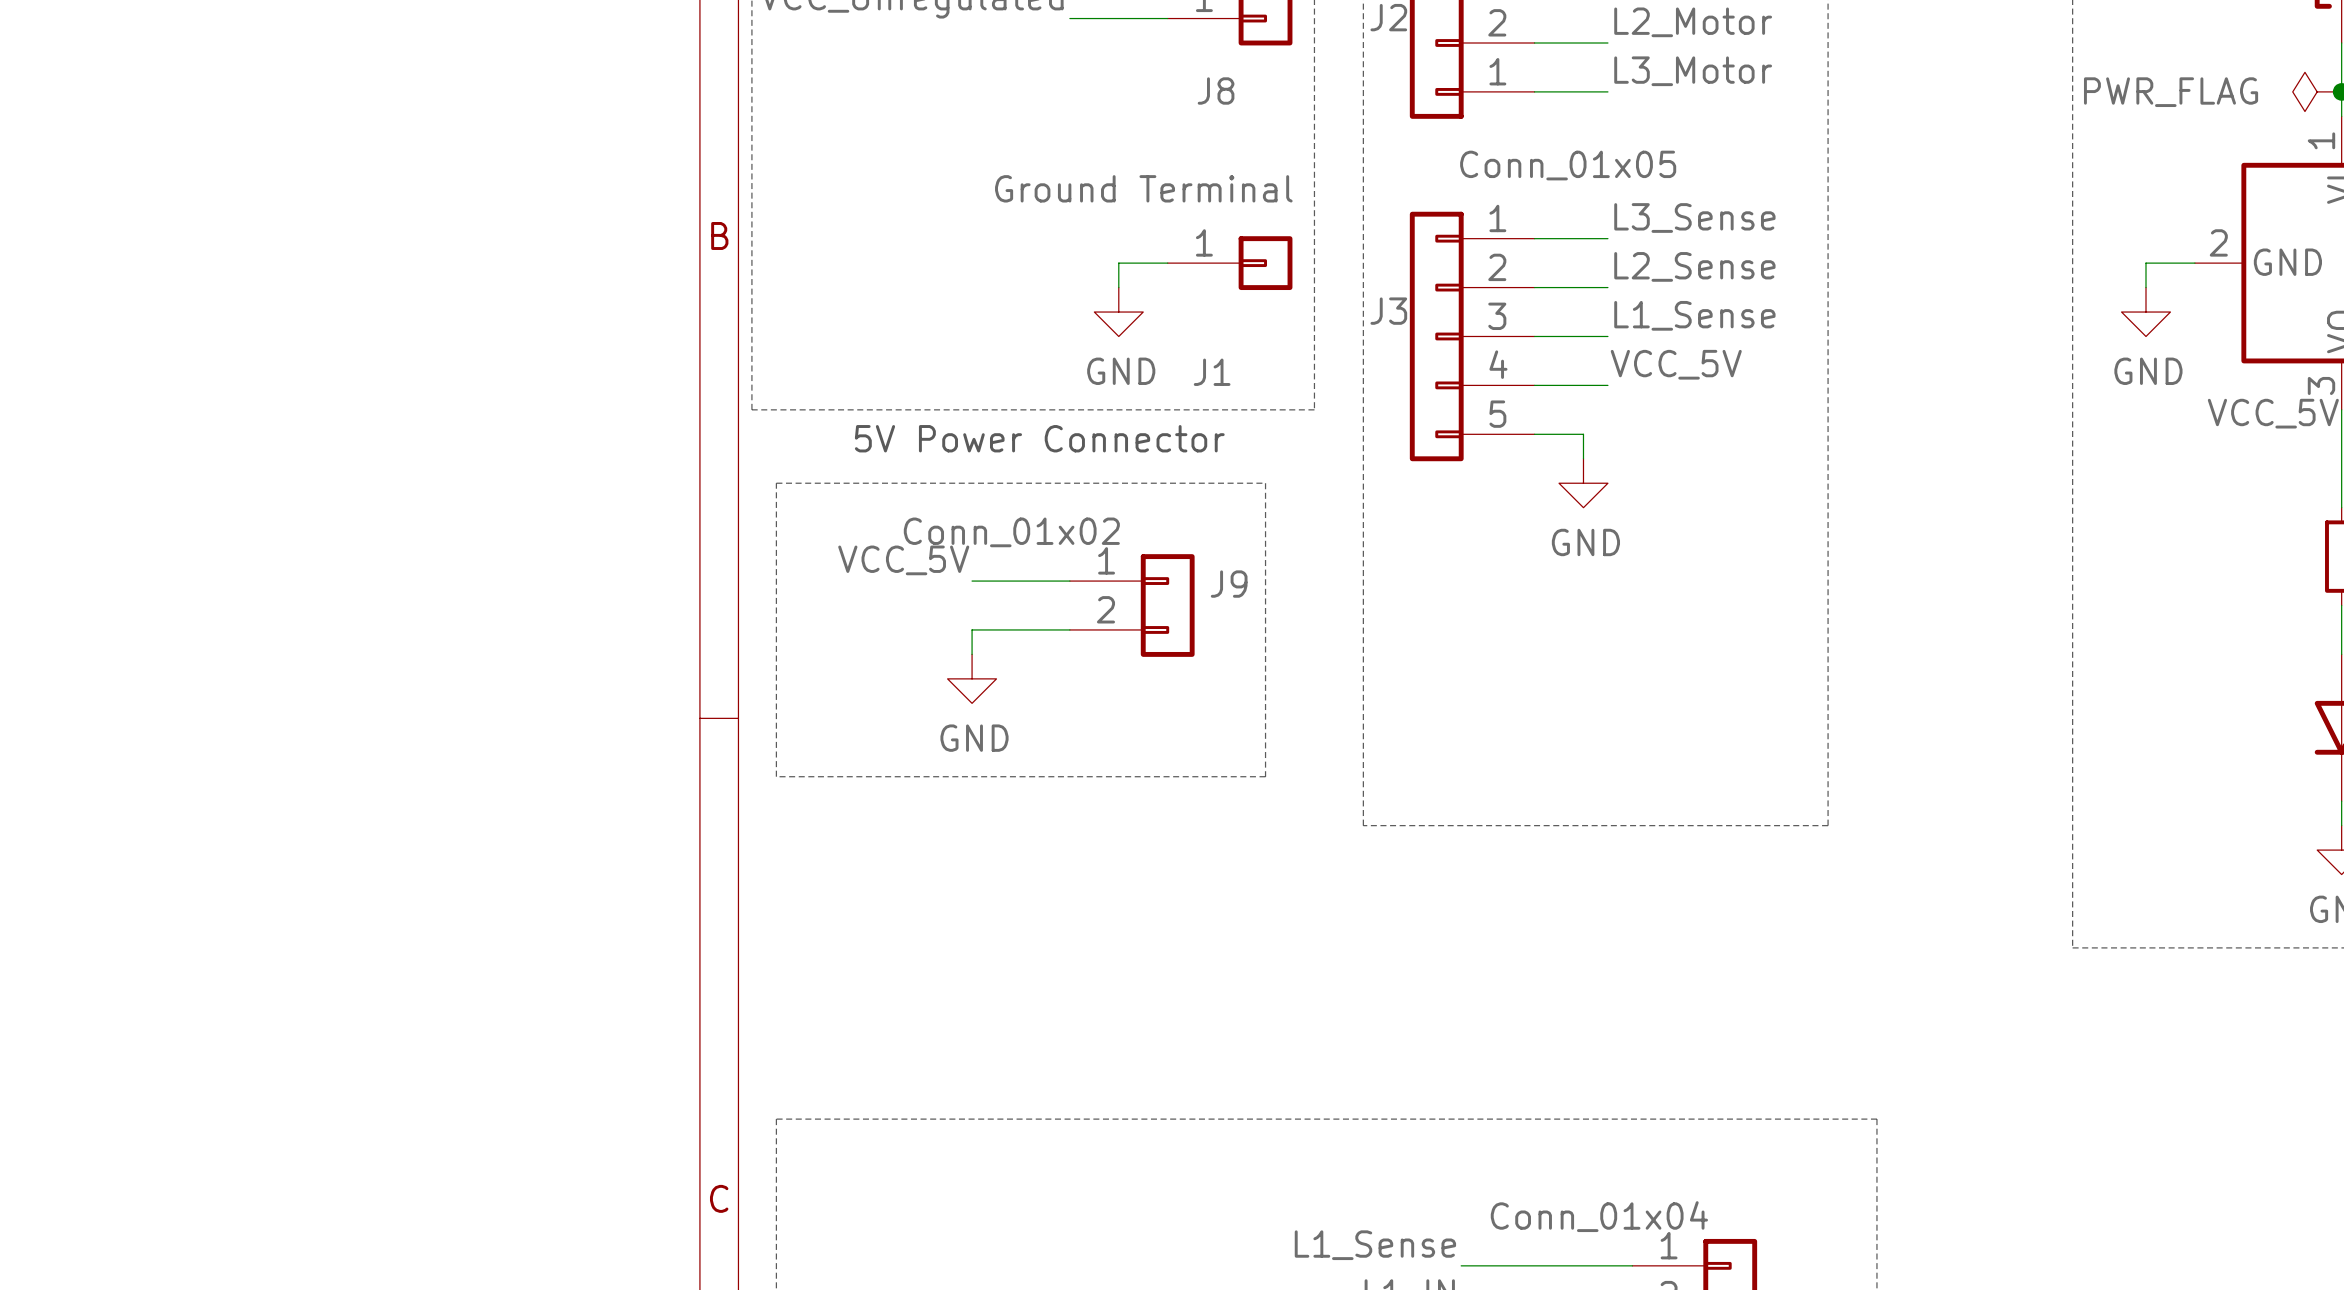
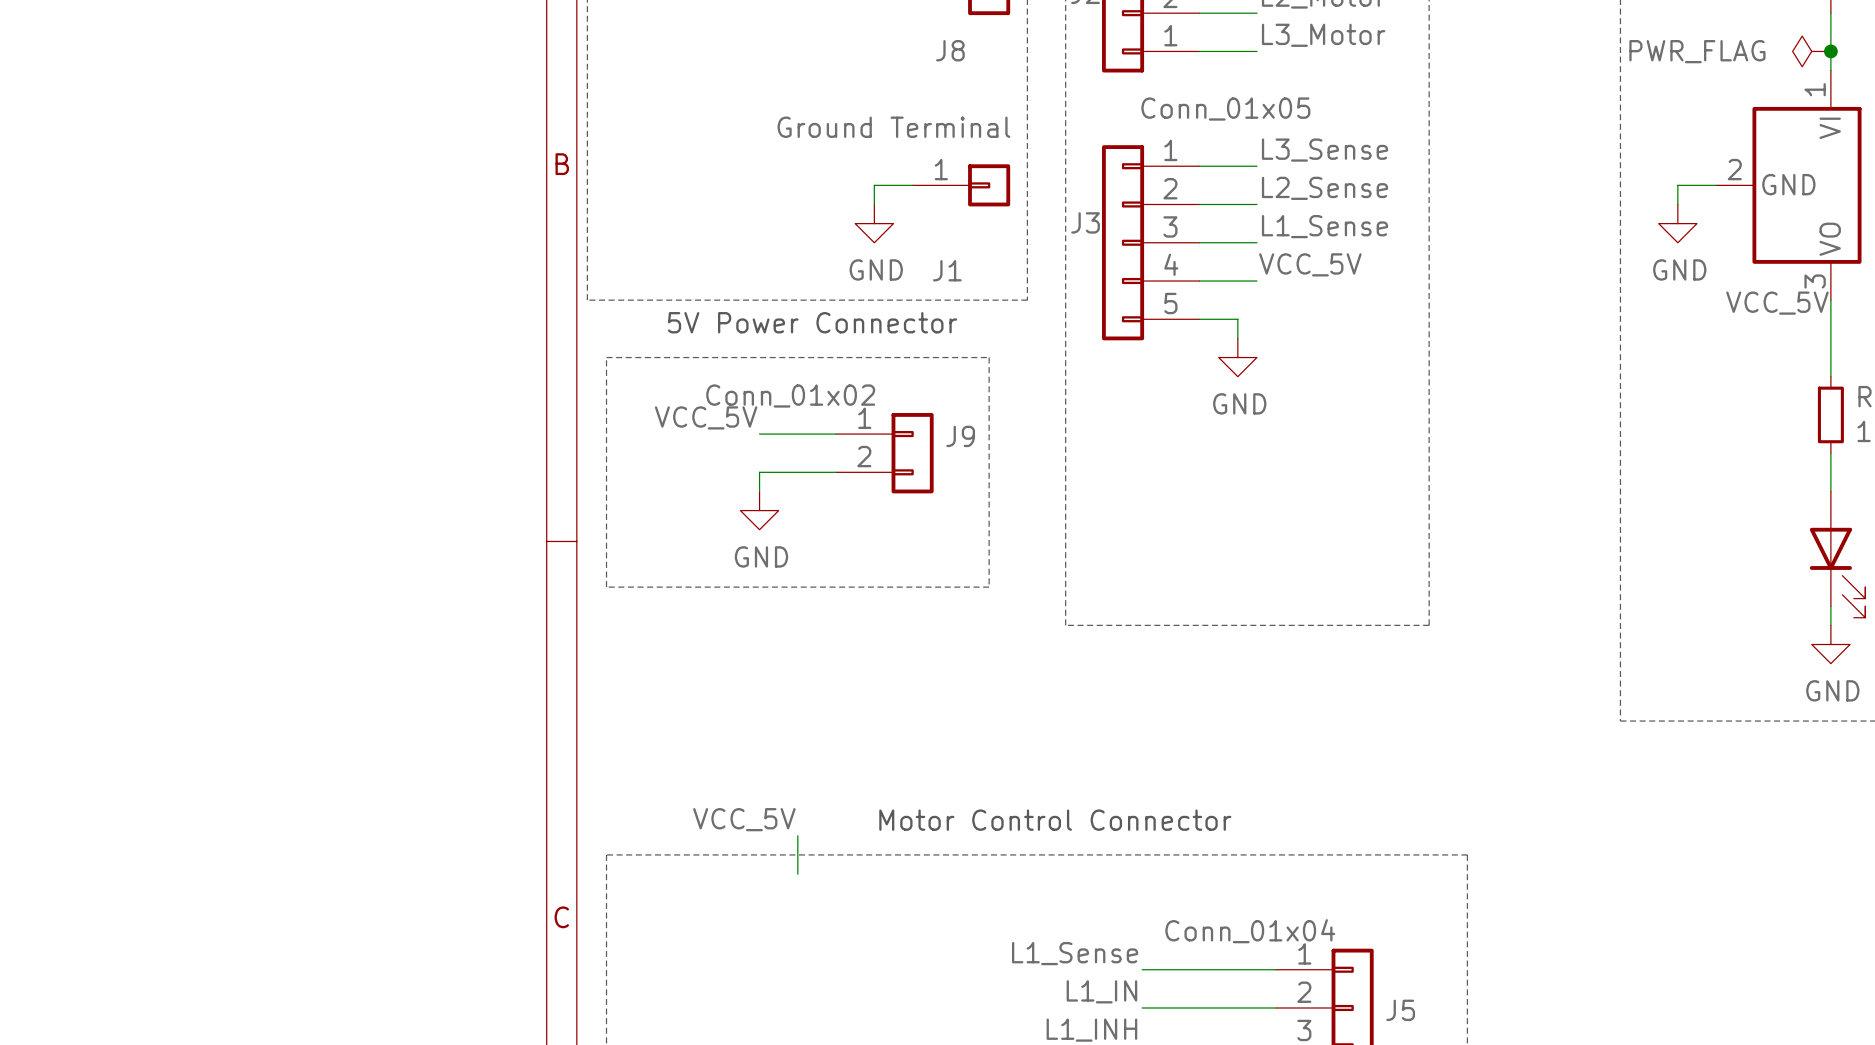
label: none -> VCC_5V (744, 819)
text: none -> Motor Control Connector (1055, 820)
wire: none -> (797, 835) (797, 874)

